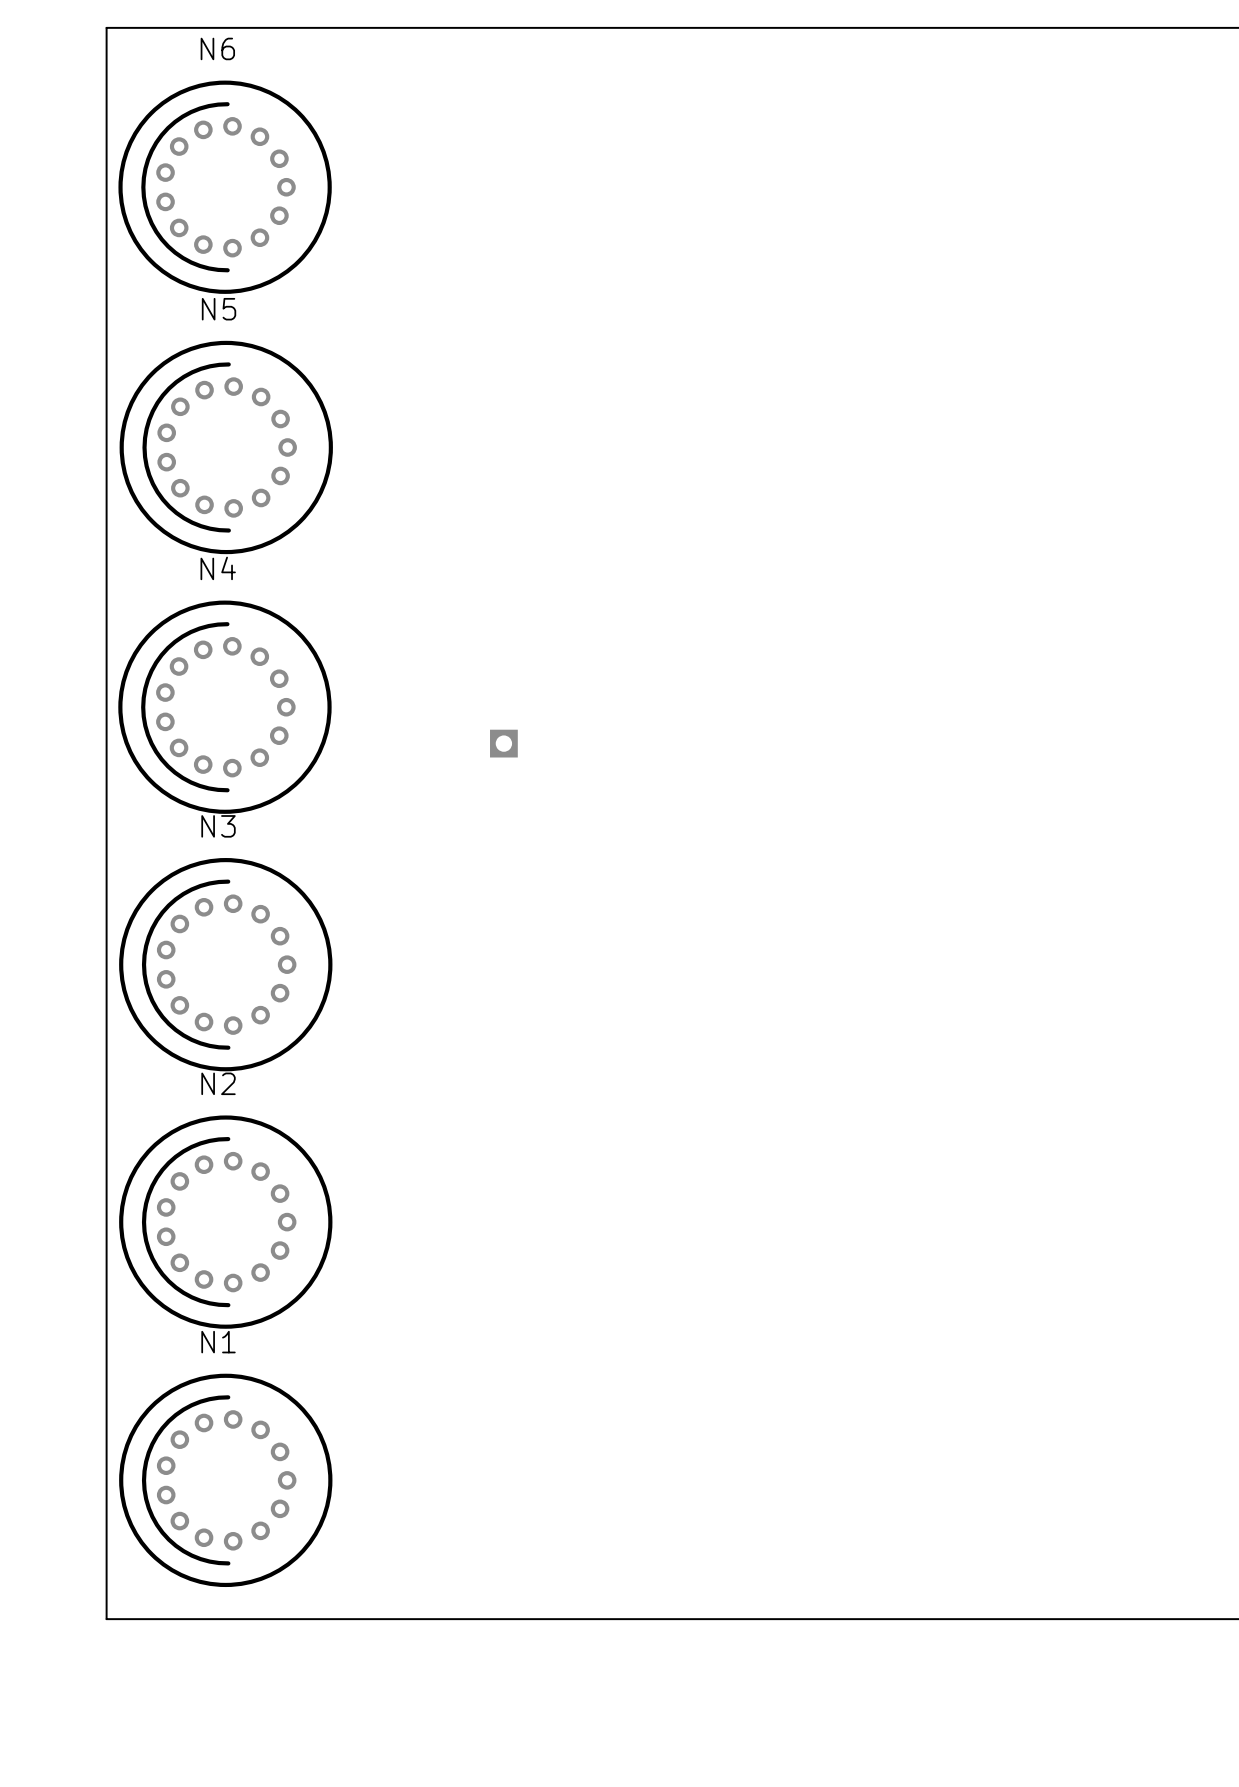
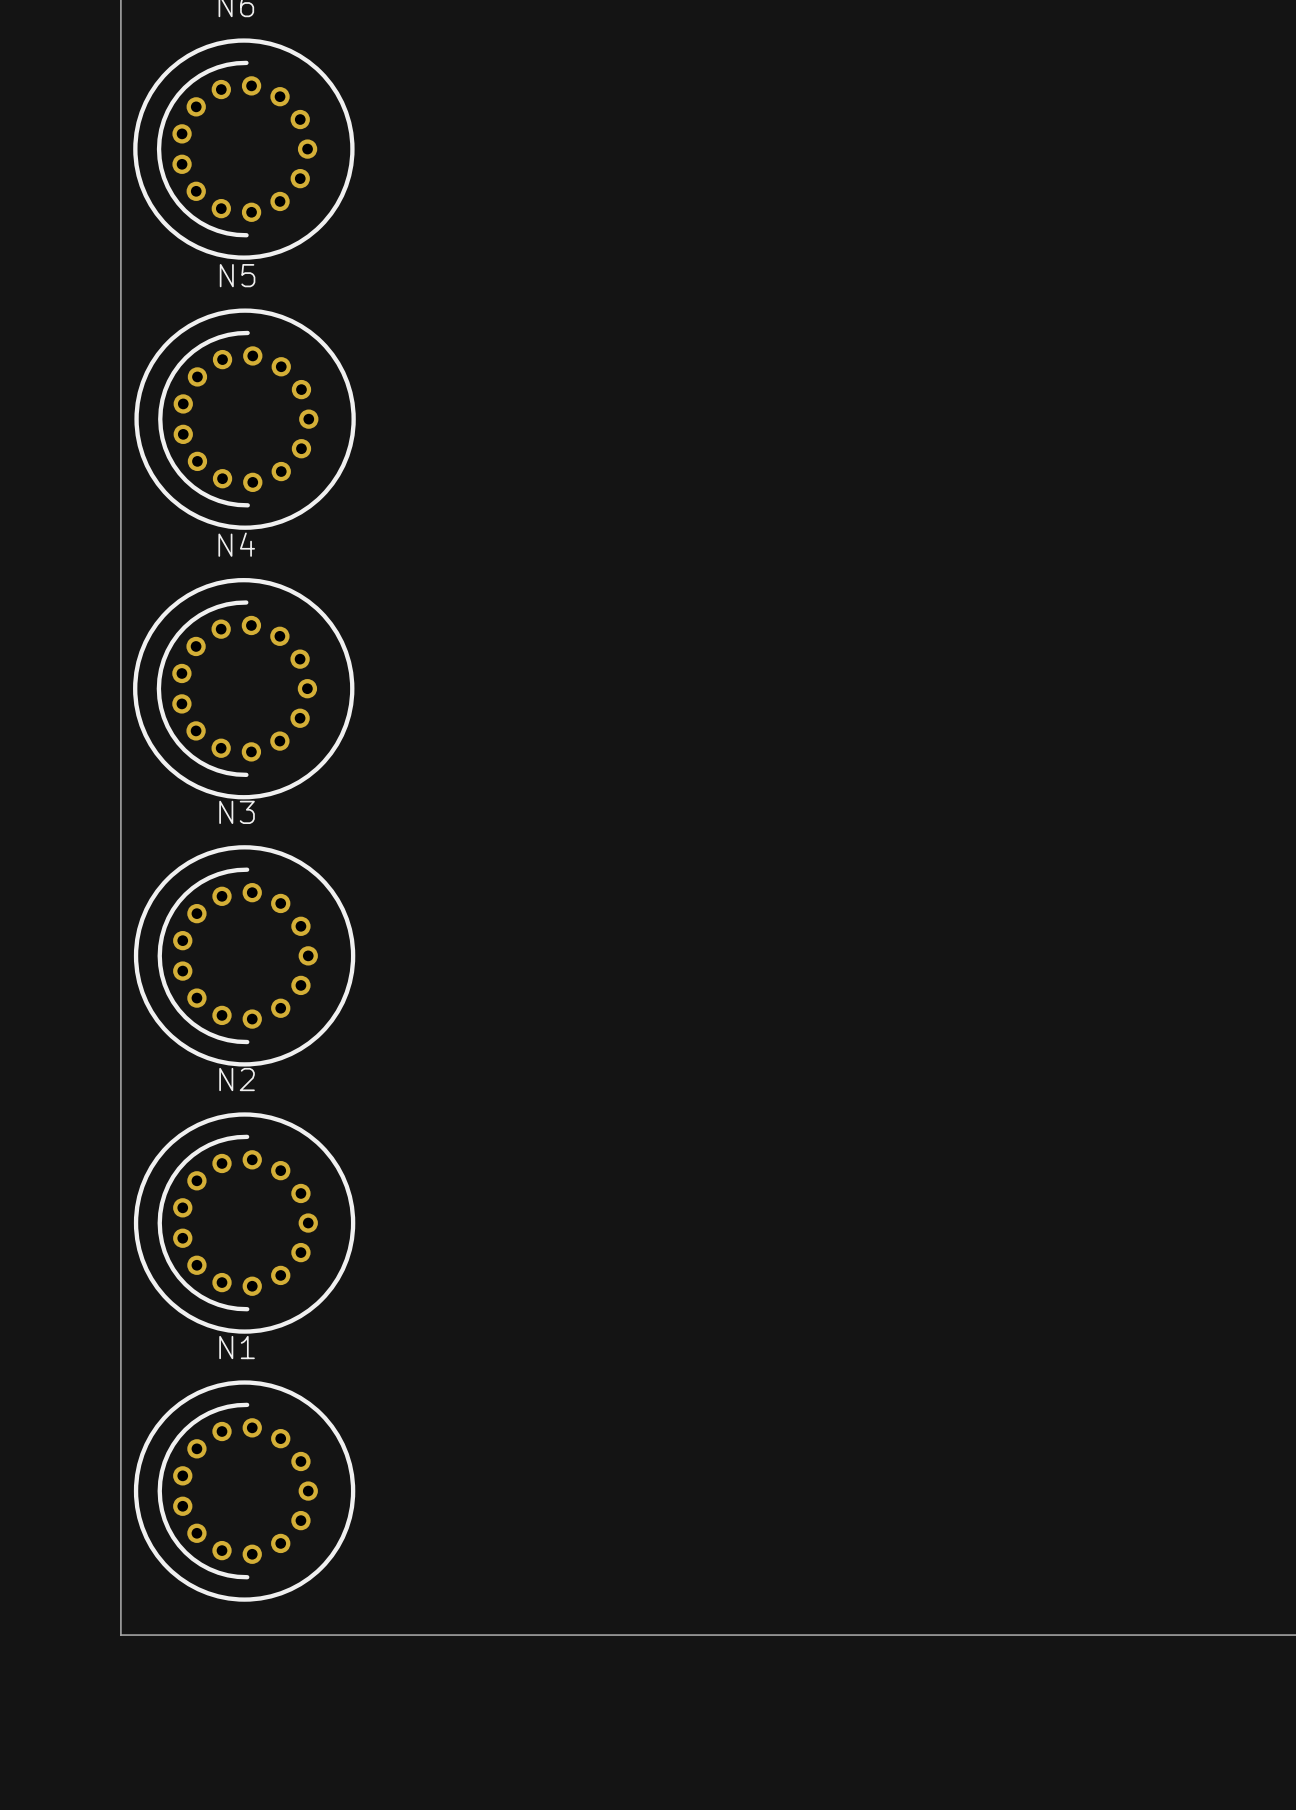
part: (503, 743) -> none

